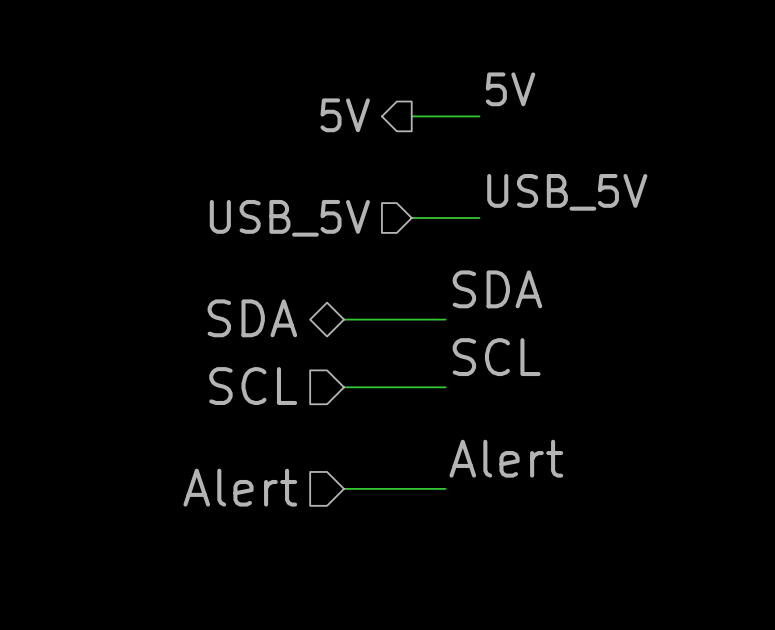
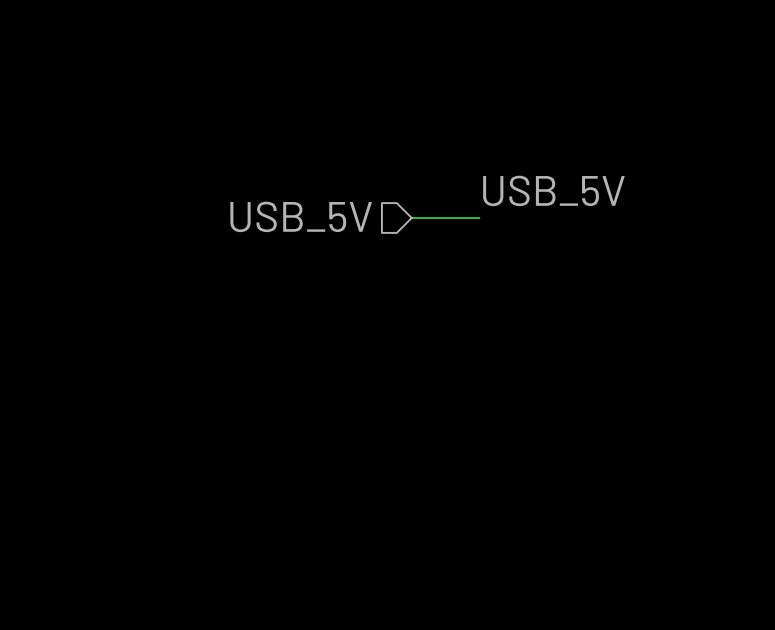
label: 5V (510, 89) -> none
hierarchical label: 5V (345, 115) -> none
wire: (411, 116) (479, 116) -> none
label: SDA (497, 289) -> none
hierarchical label: SDA (252, 318) -> none
wire: (344, 319) (445, 319) -> none
label: SCL (496, 357) -> none
hierarchical label: SCL (253, 386) -> none
wire: (344, 387) (445, 387) -> none
label: Alert (506, 458) -> none
hierarchical label: Alert (240, 487) -> none
wire: (344, 488) (445, 488) -> none

